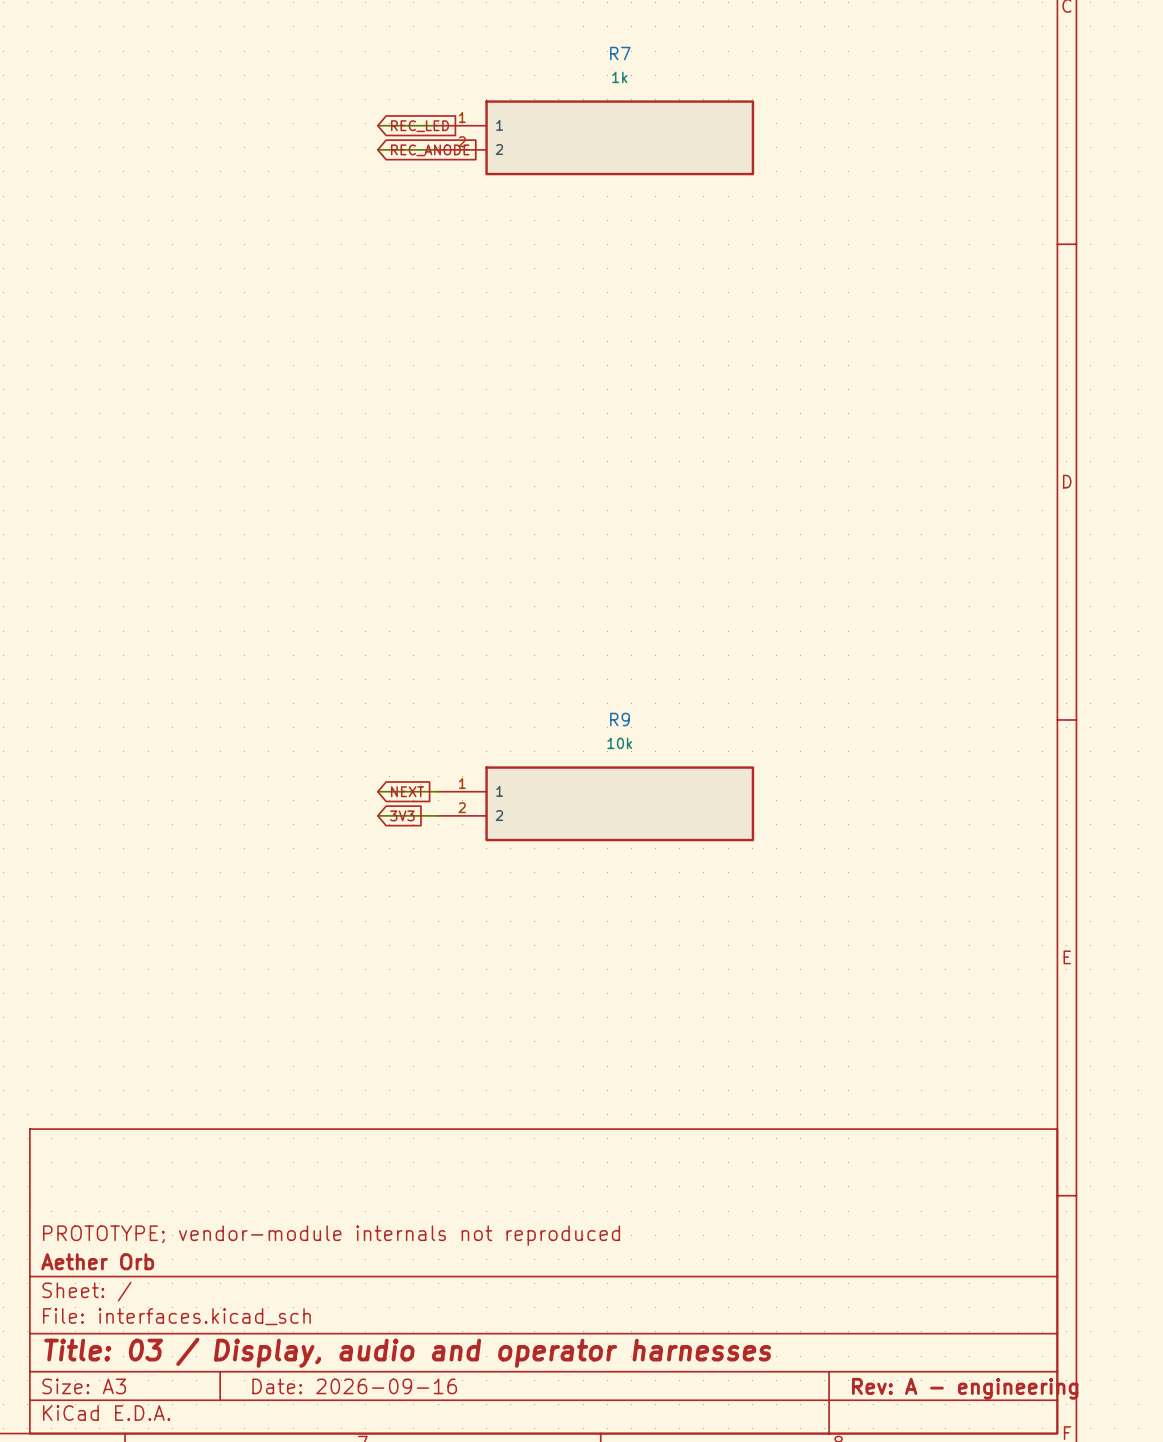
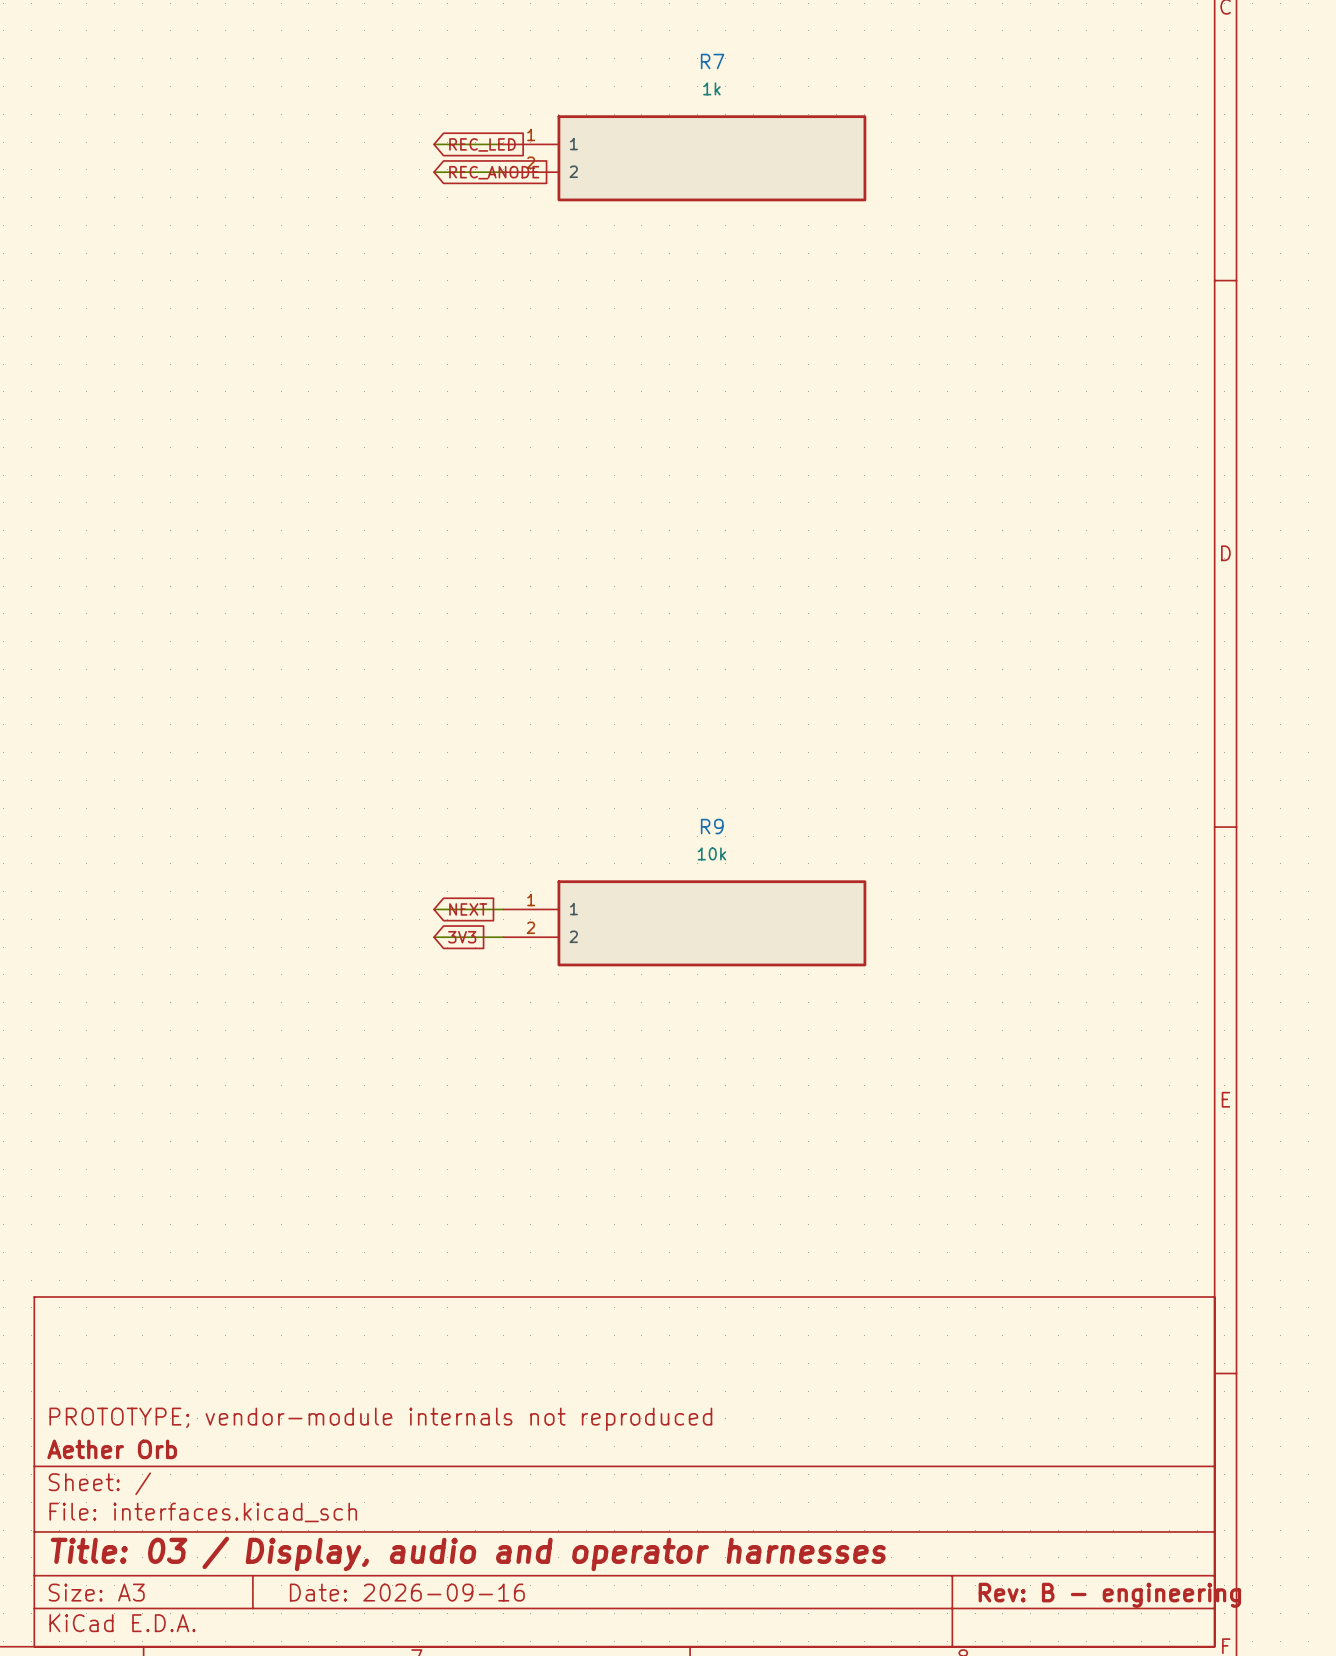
title block: Rev: A - engineering (965, 1388) -> Rev: B - engineering (1109, 1595)

